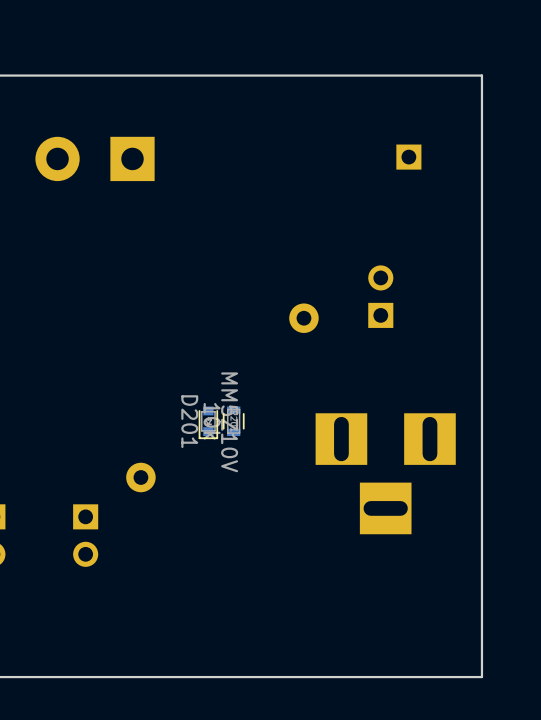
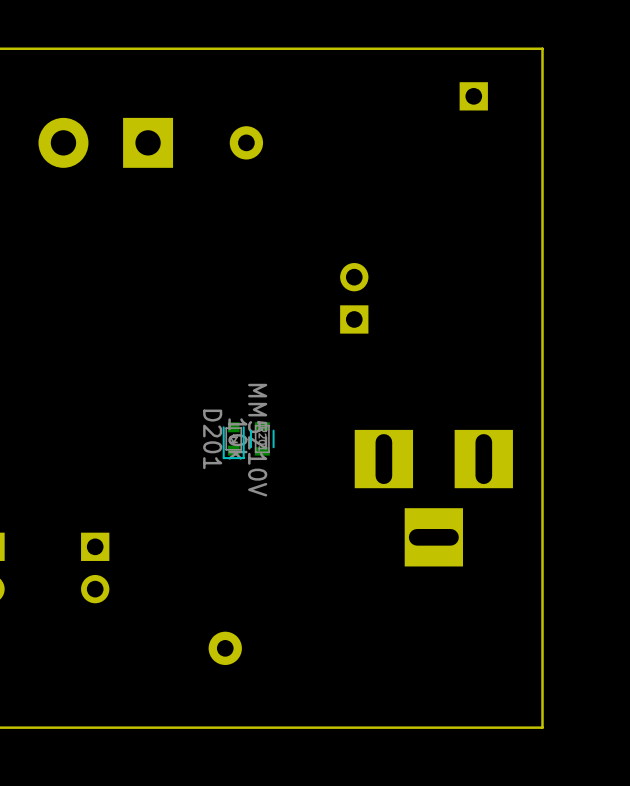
part position: (408, 157) -> (473, 96)
part: none -> (246, 142)
part position: (380, 296) -> (354, 298)
part: (303, 318) -> none
part position: (140, 477) -> (225, 648)

